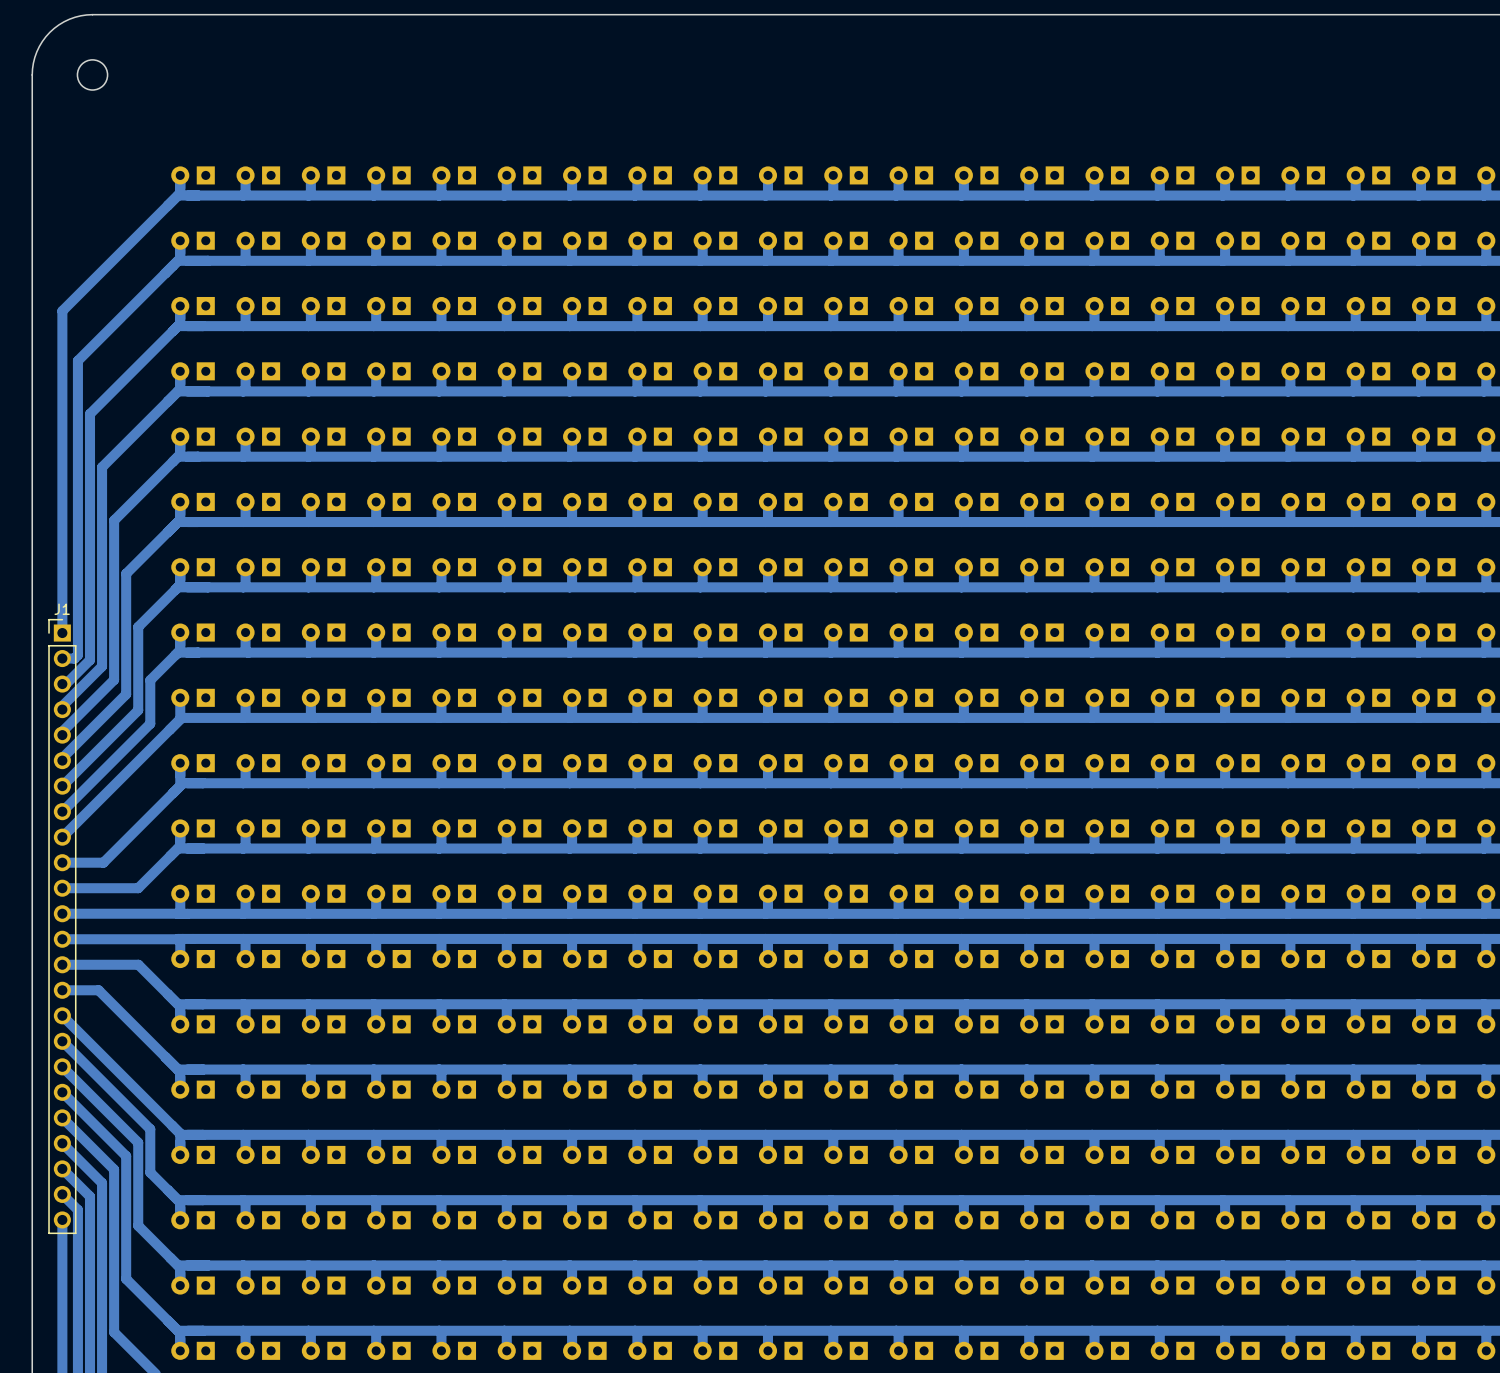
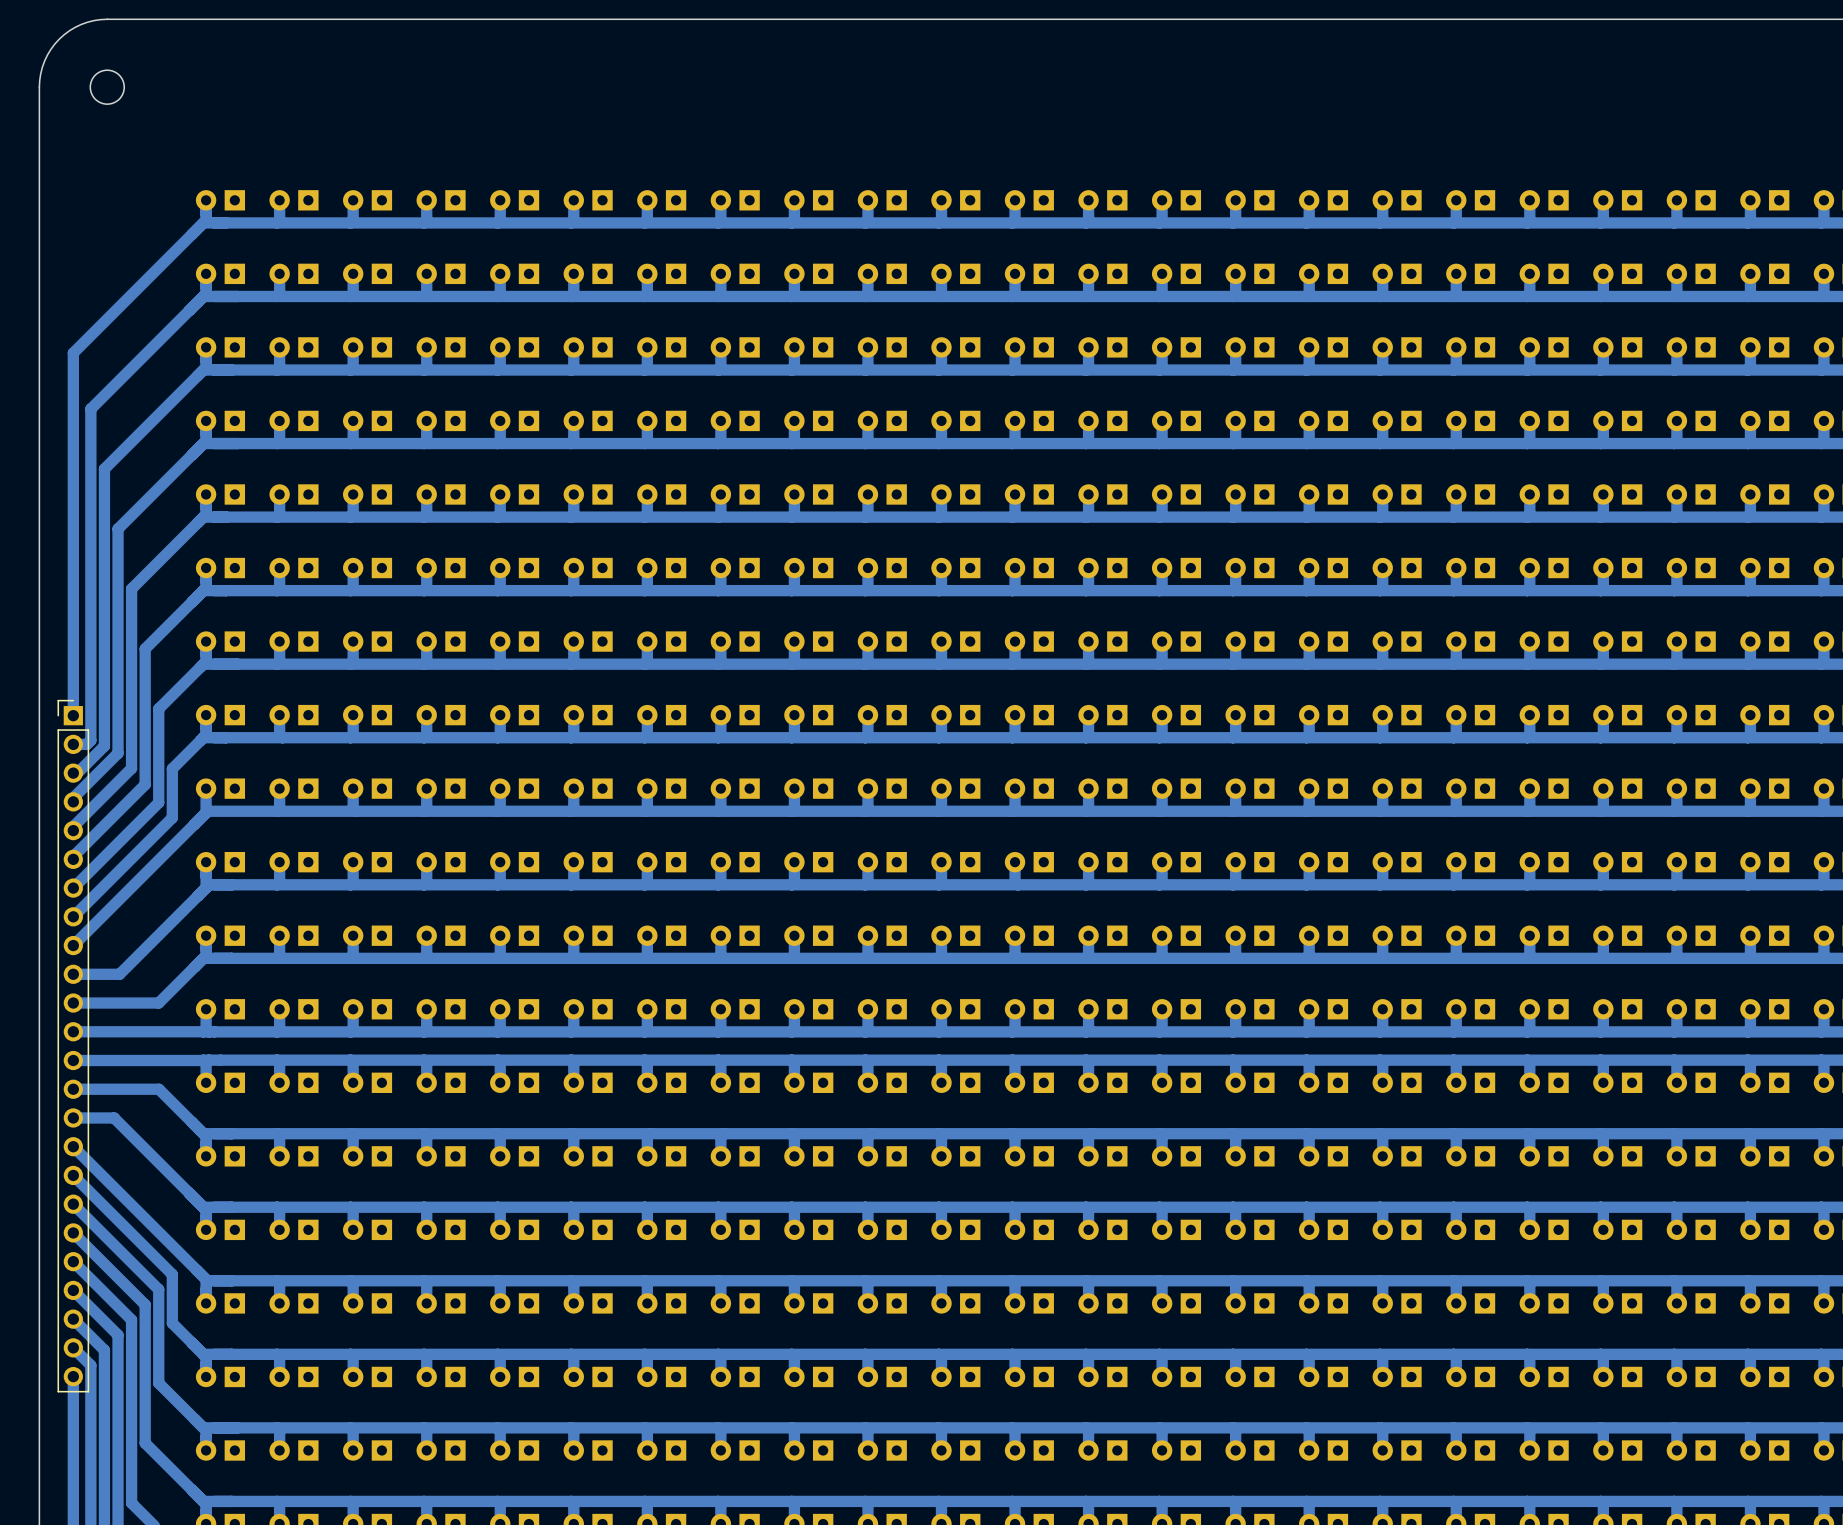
J1 name: J1 (62, 609) -> none

